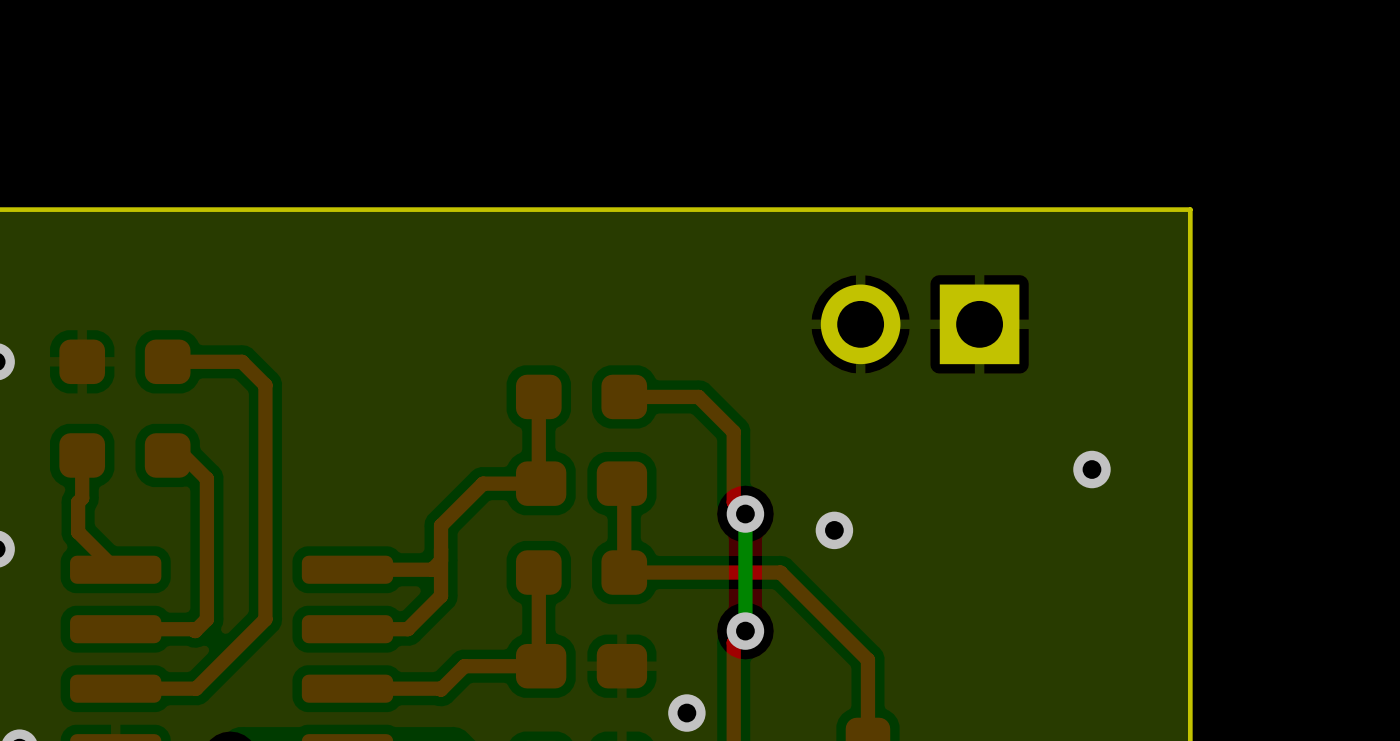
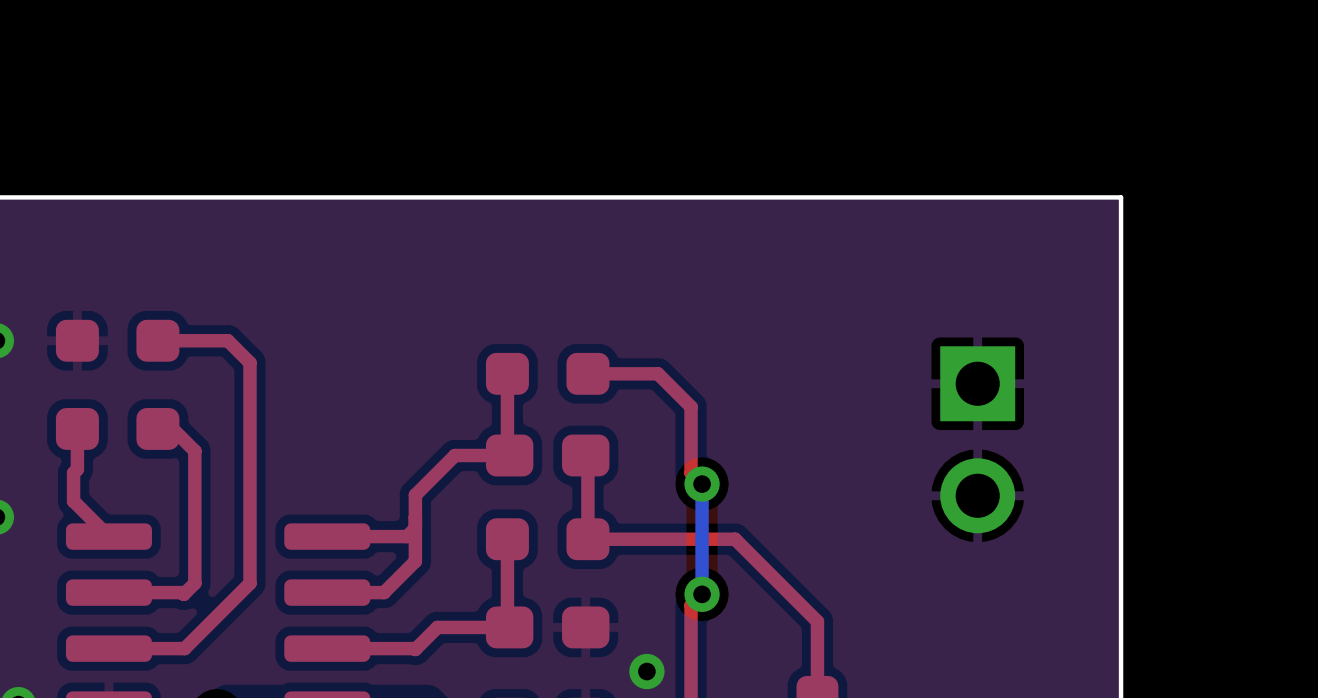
part rotation: 0° (920, 324) -> 90° counterclockwise (977, 439)
part position: (920, 324) -> (977, 439)
via: (1091, 469) -> none
via: (834, 530) -> none

